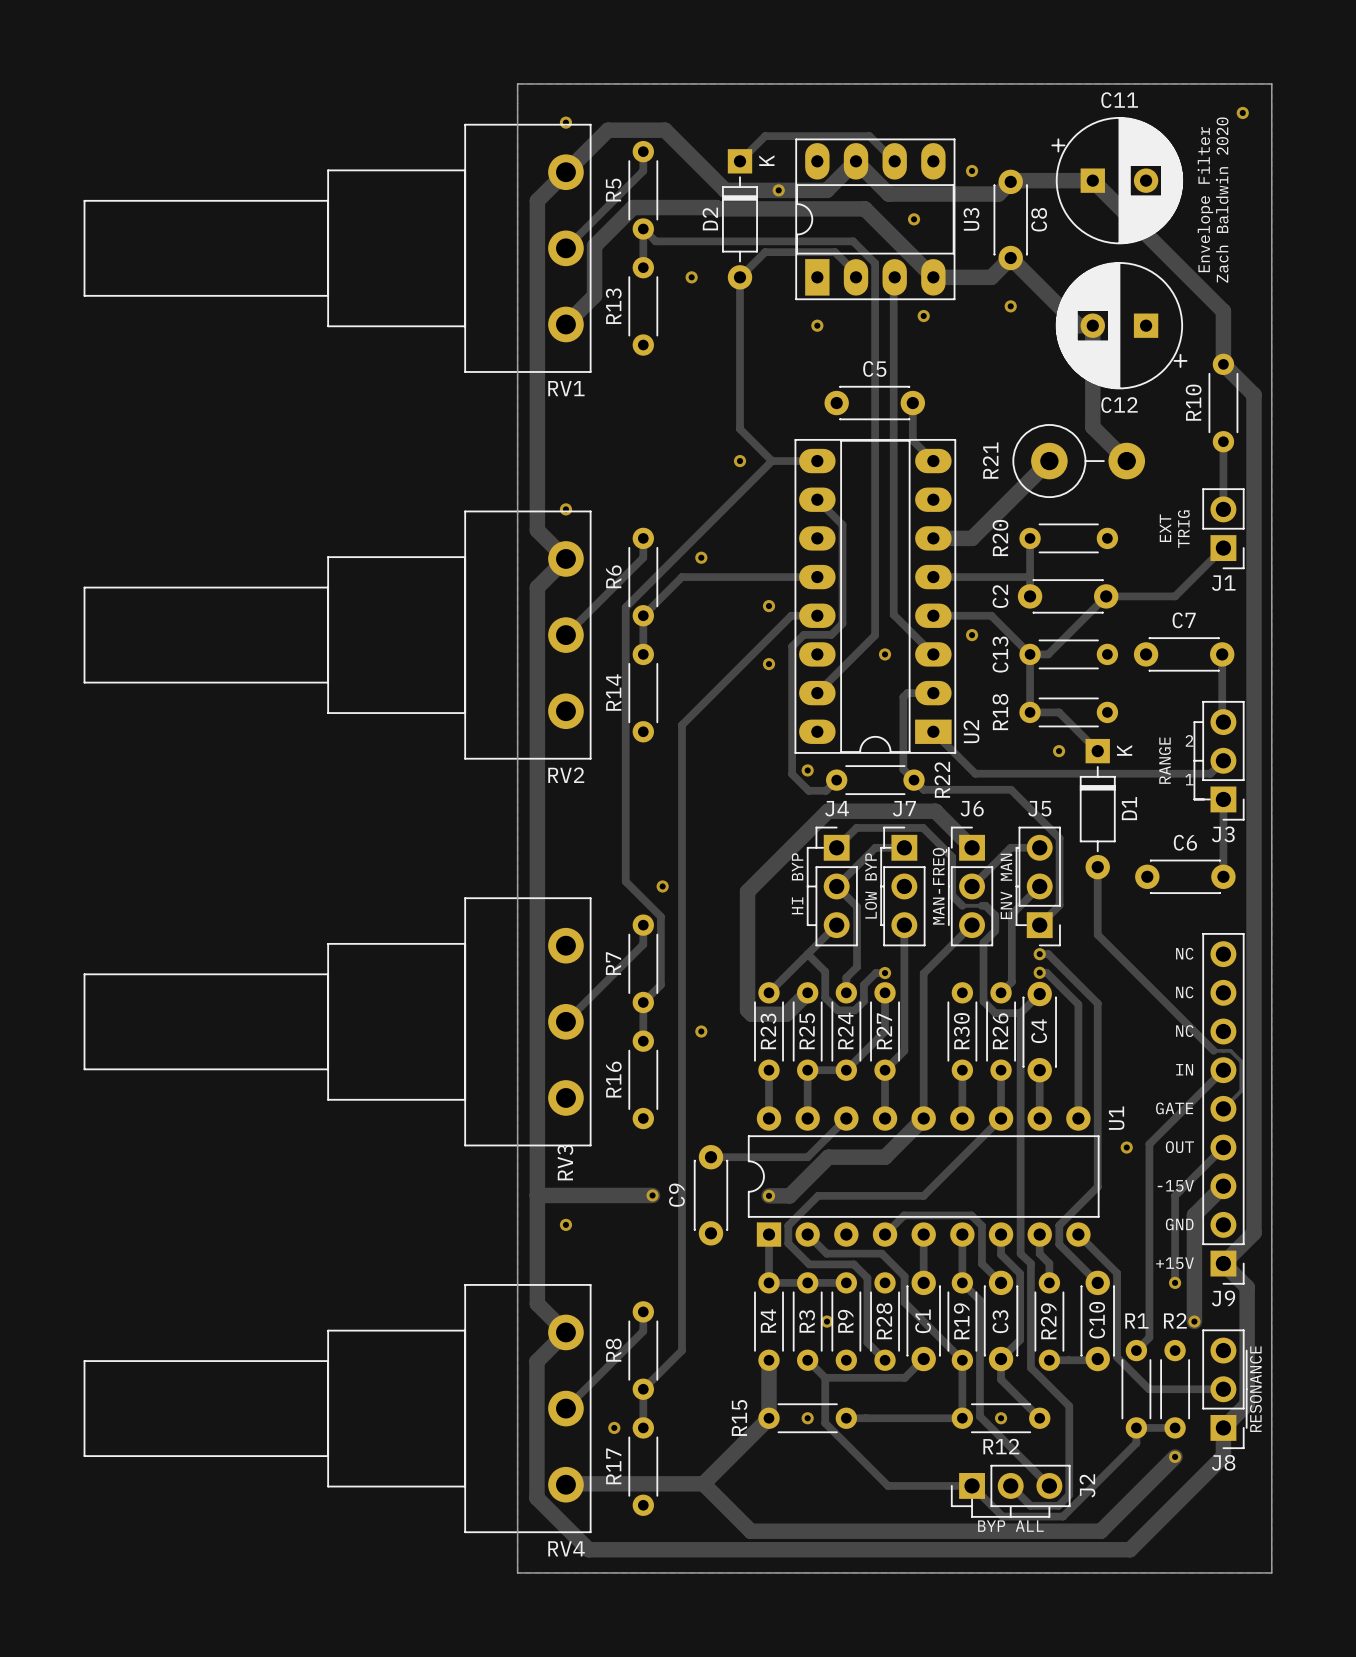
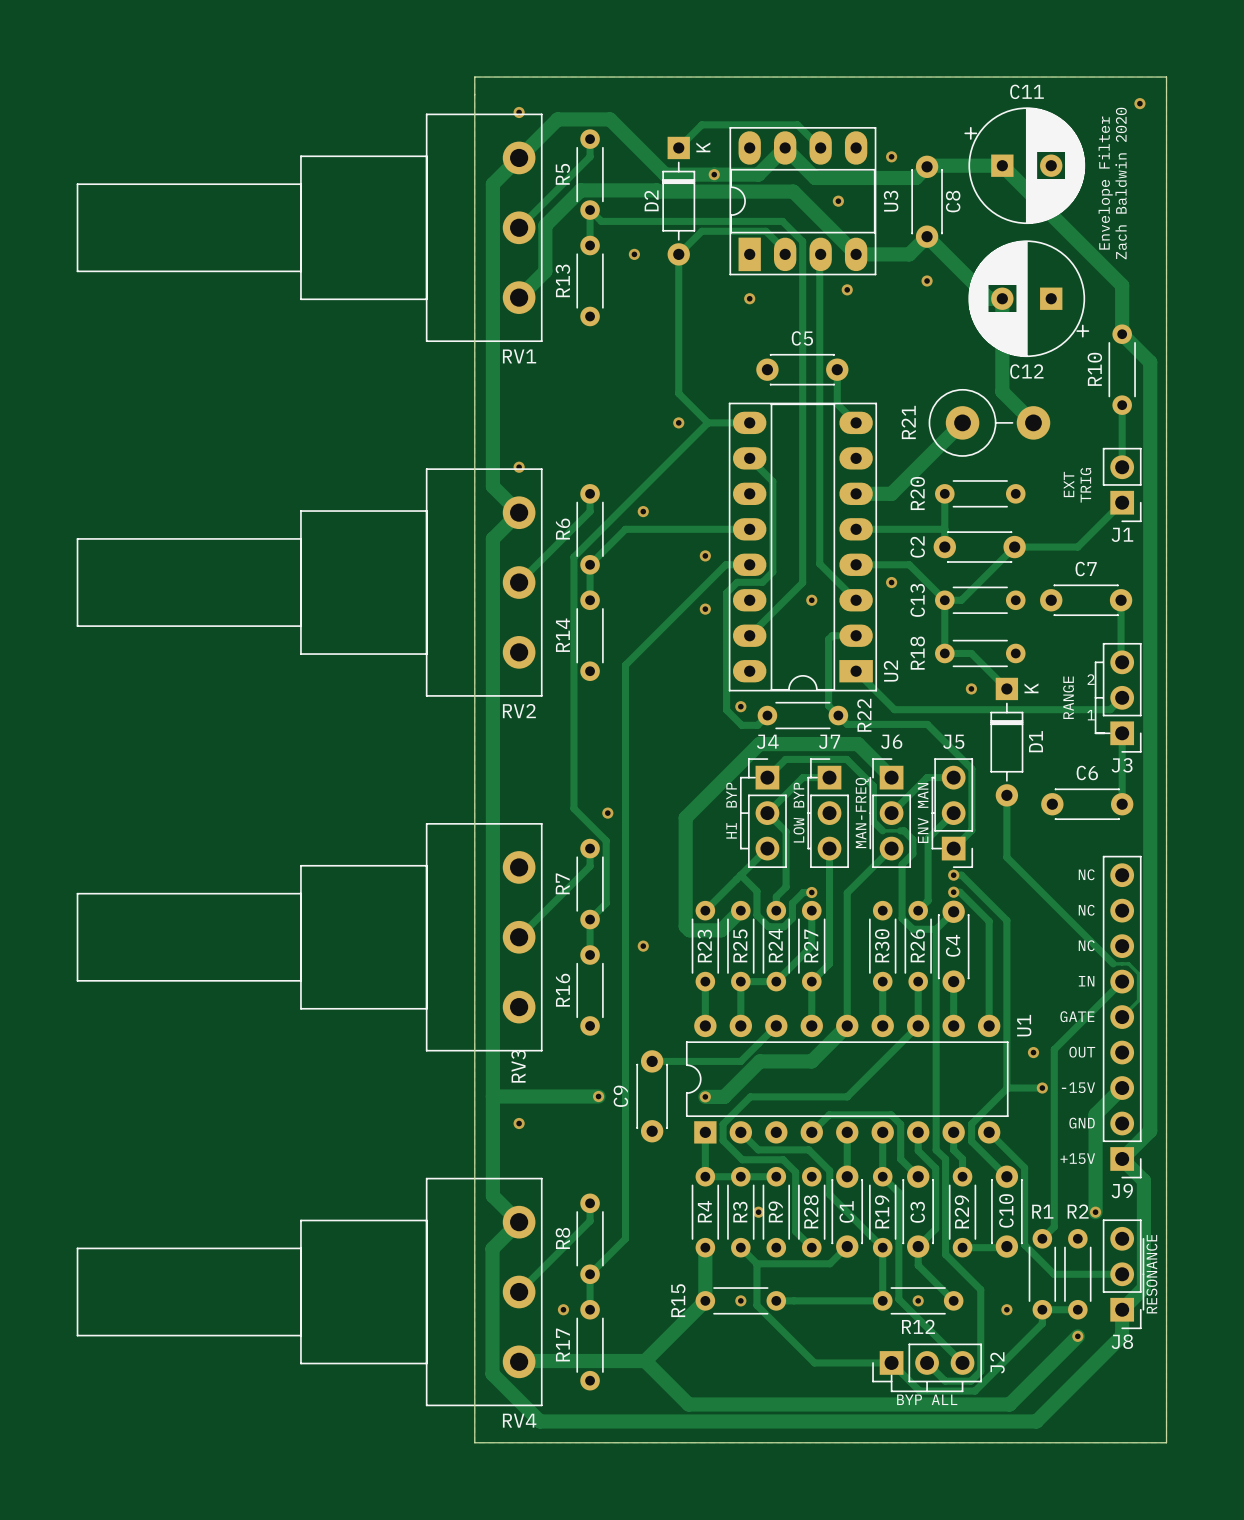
track: (1223, 1147) (1175, 1195) (1175, 1282) -> none
track: none -> (1007, 1088) (1042, 1088)
via: none -> (1042, 1088)
via: (1175, 1282) -> none
via: none -> (1006, 1309)

